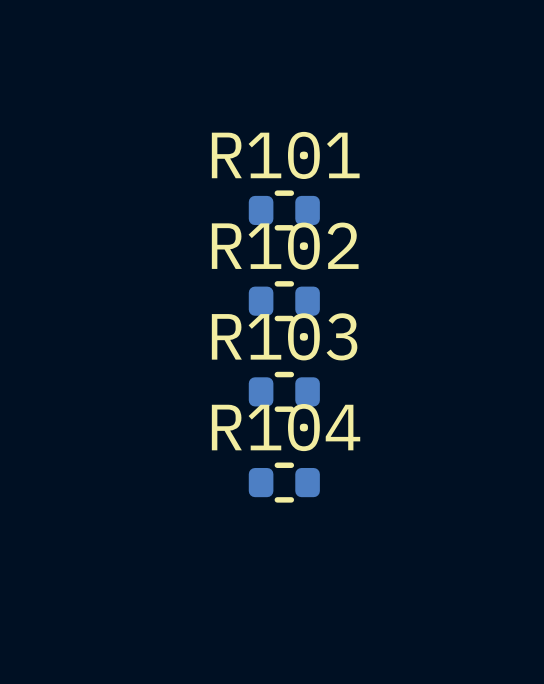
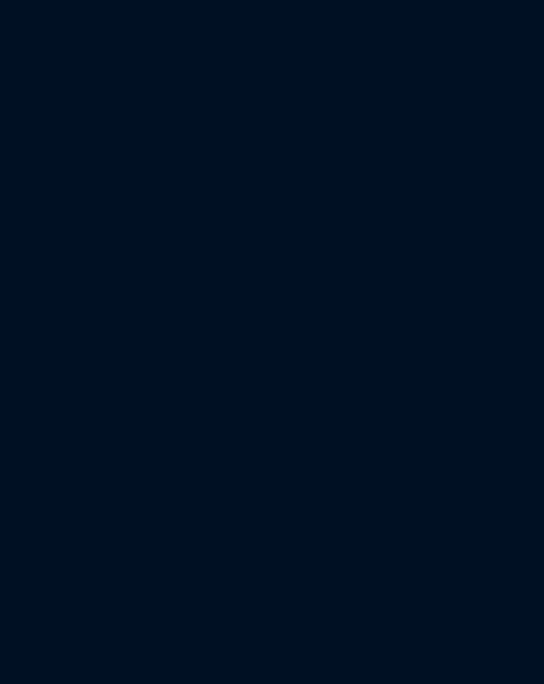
R101: (284, 210) -> none
R102: (284, 301) -> none
R103: (284, 391) -> none
R104: (284, 482) -> none

